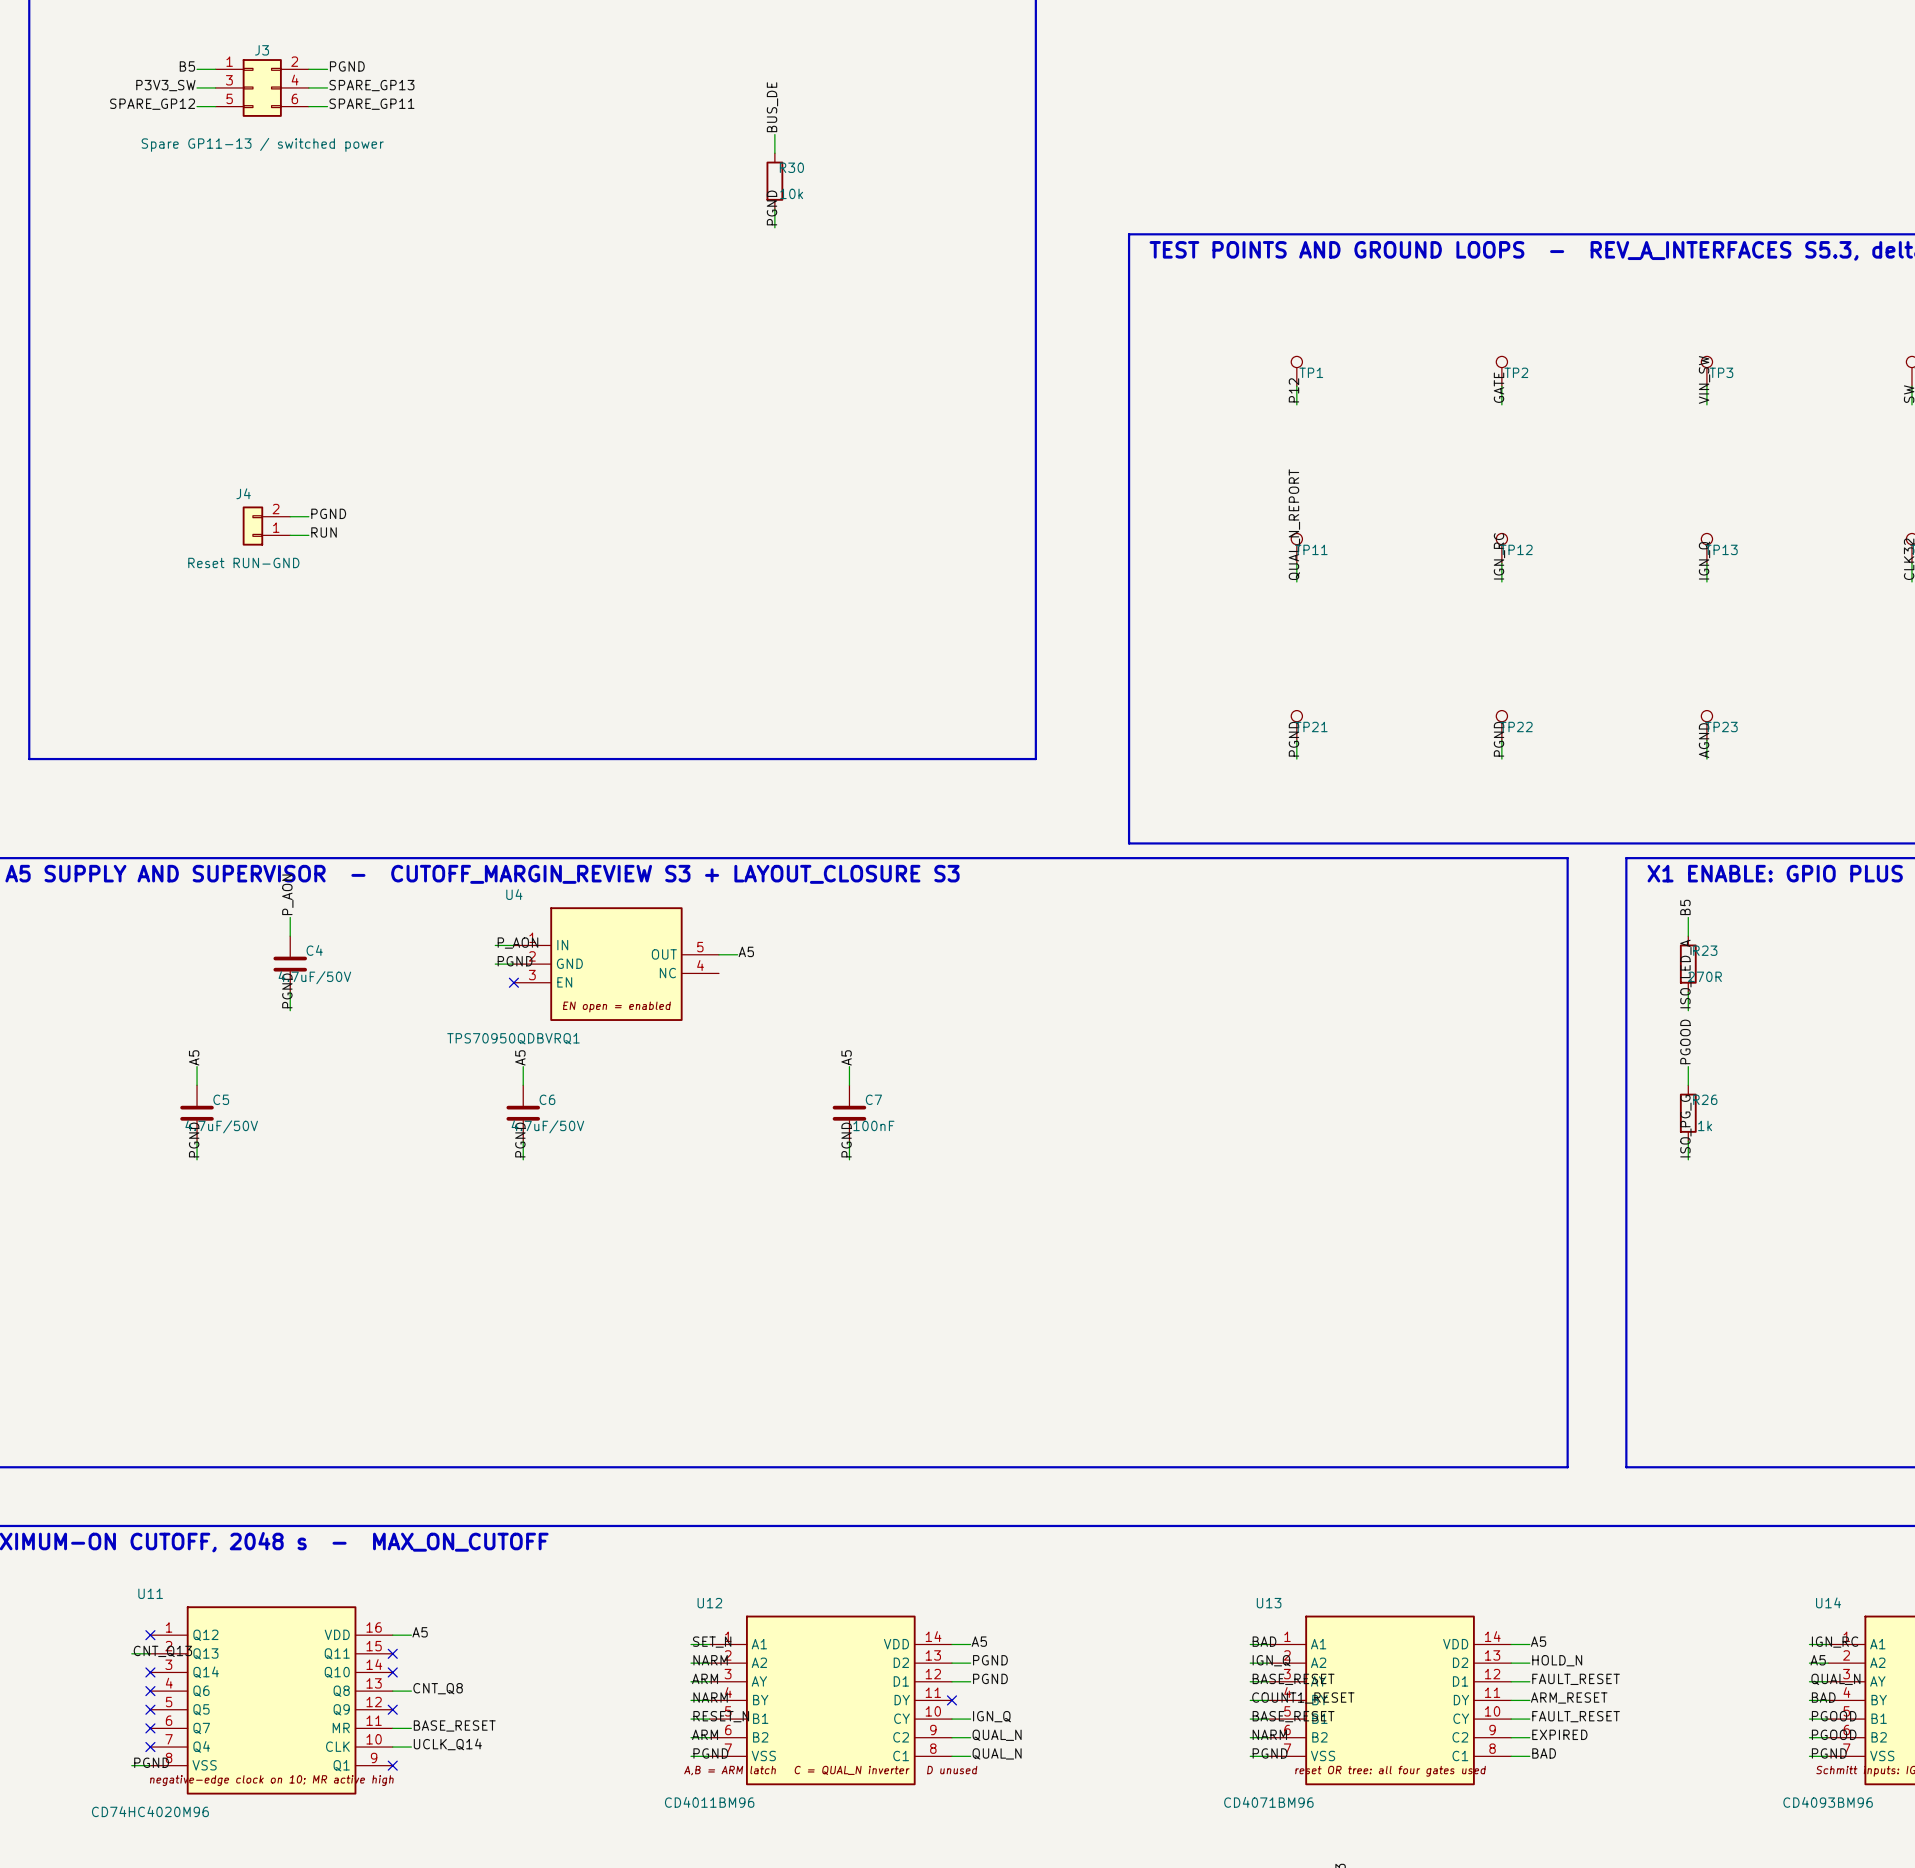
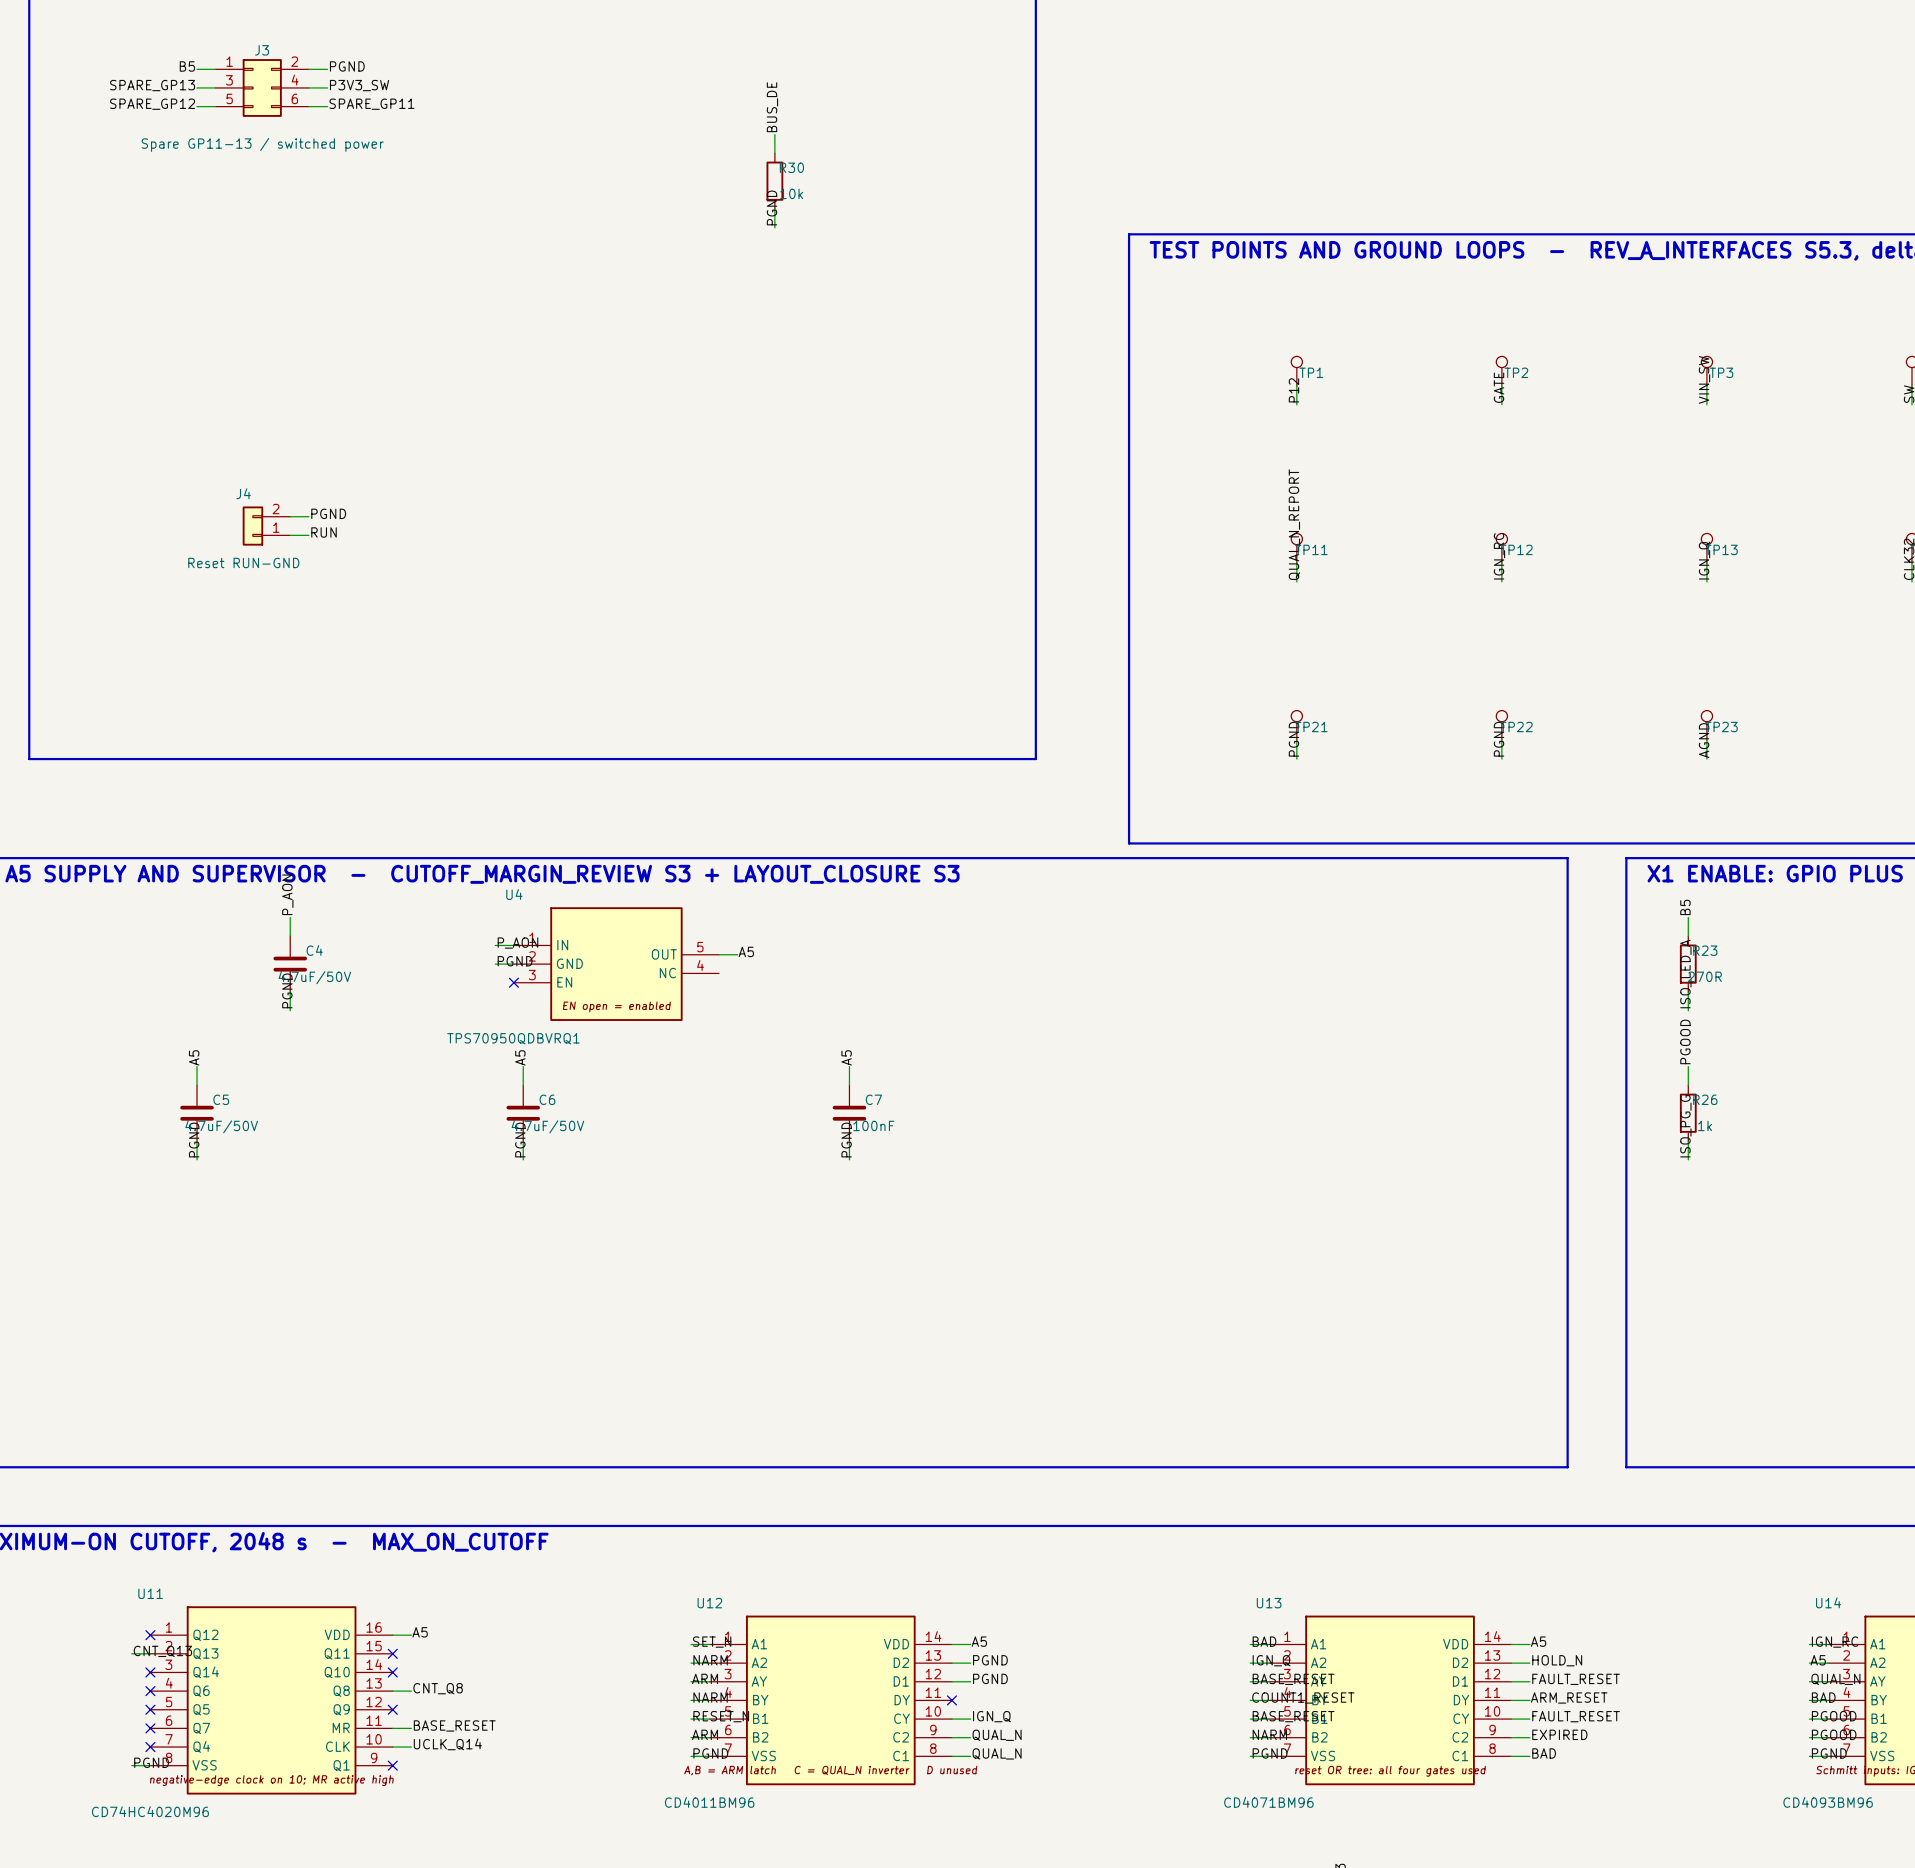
label: P3V3_SW (165, 85) -> SPARE_GP13 (152, 85)
label: SPARE_GP13 (371, 85) -> P3V3_SW (359, 85)

